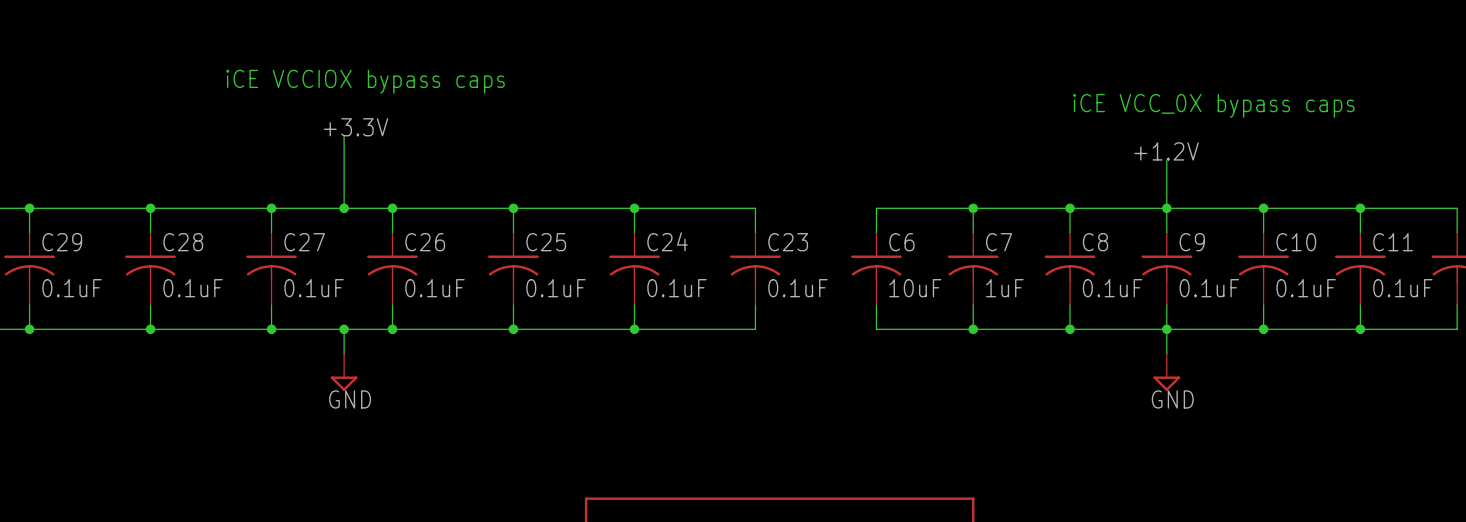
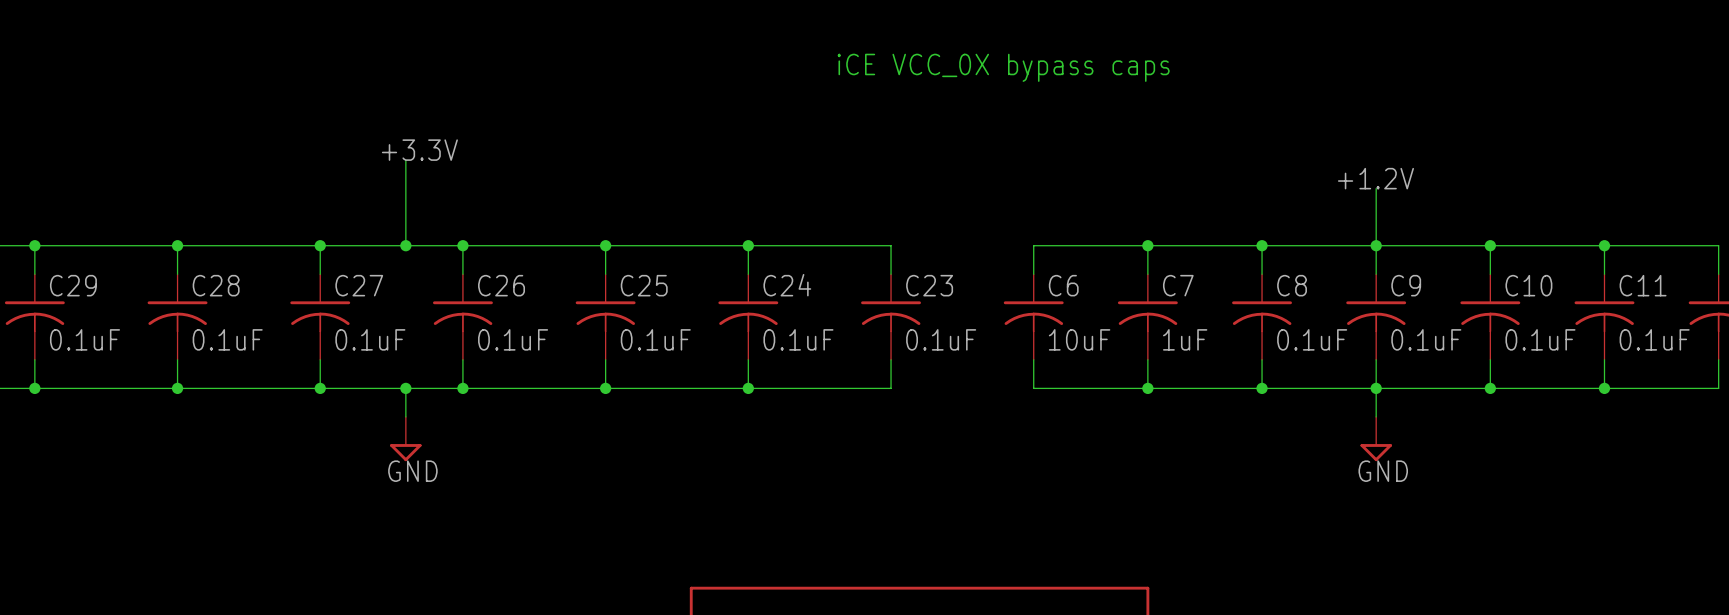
text: none -> iCE VCC_0X bypass caps (1003, 67)
text: iCE VCCIOX bypass caps (365, 81) -> none
text: iCE VCC_0X bypass caps (1213, 105) -> none

